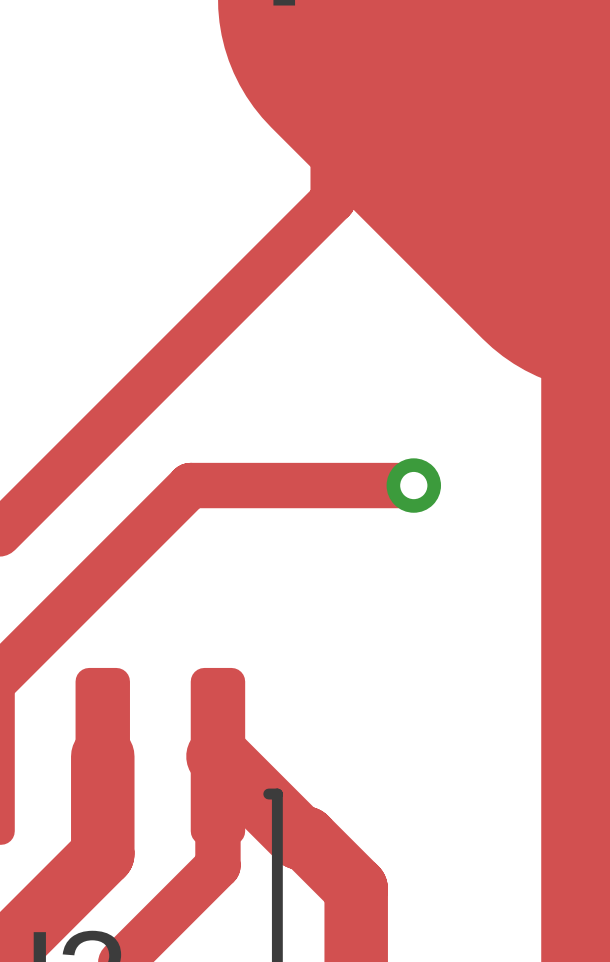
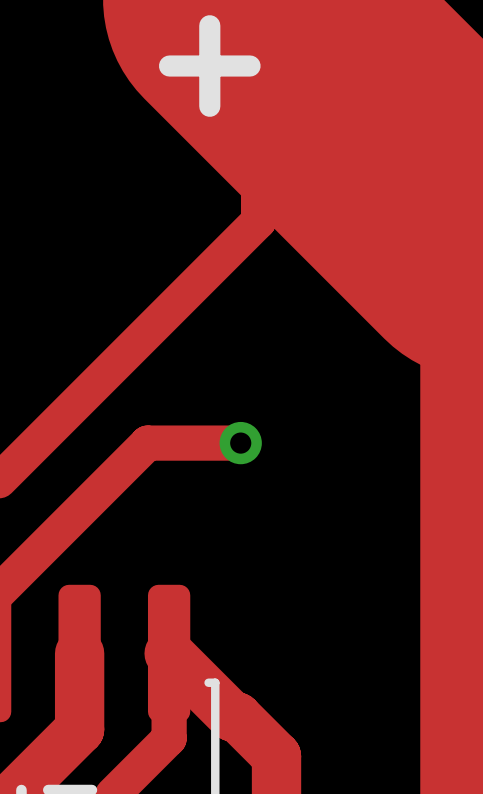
track: (310, 485) (413, 485) -> none
via position: (413, 485) -> (240, 443)

